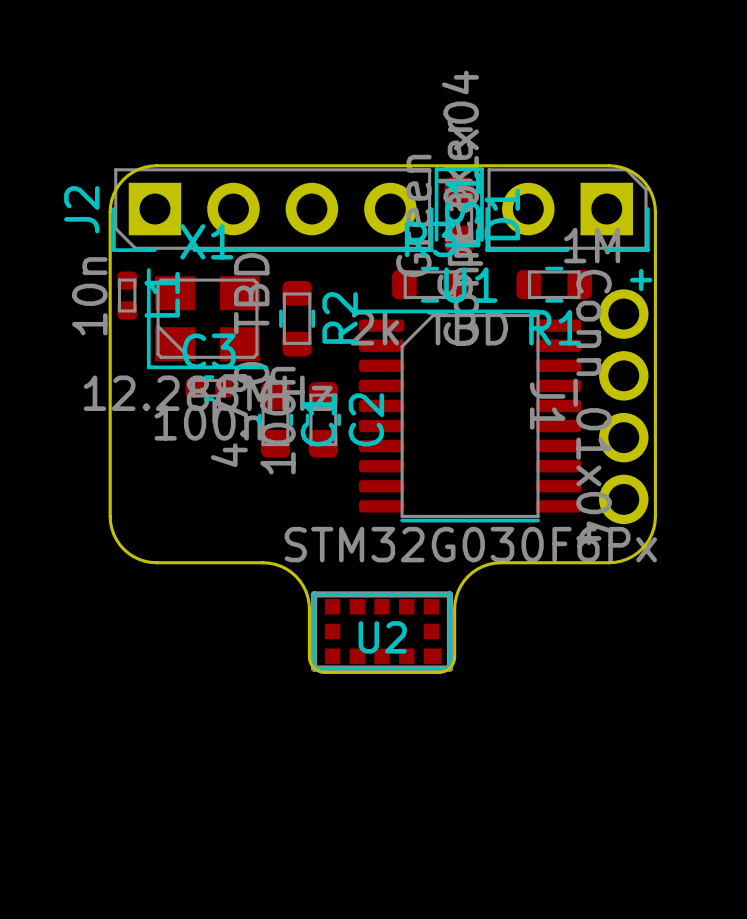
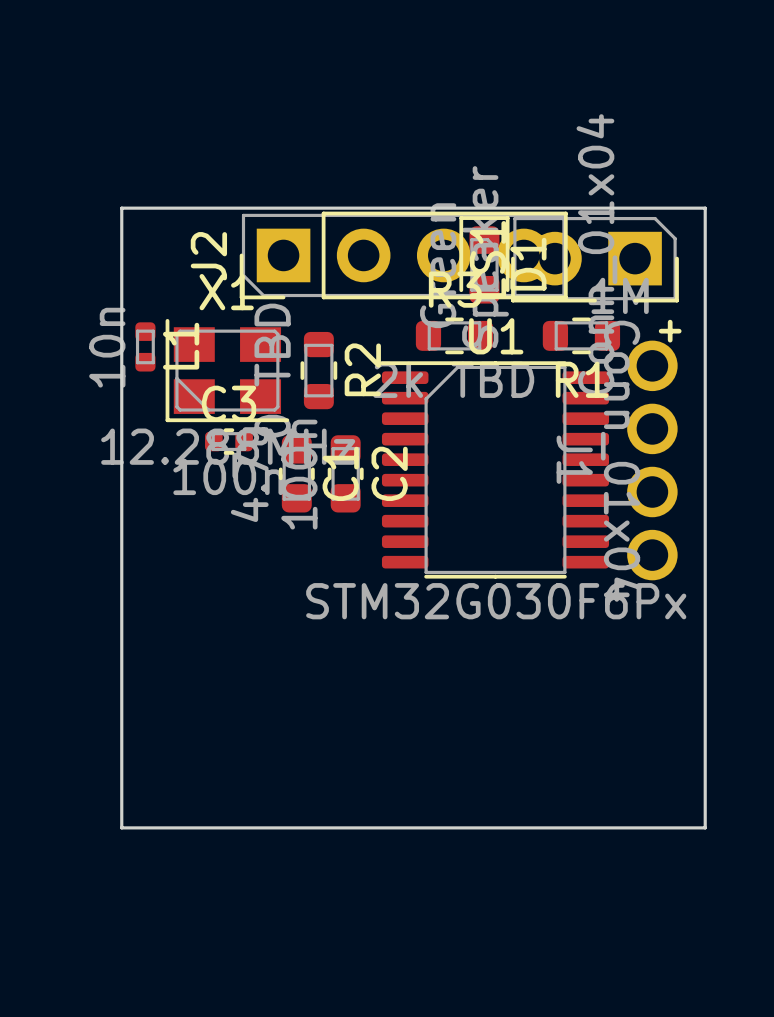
board edge: (156, 165) (609, 165) (626, 169) (637, 175) (649, 188) (653, 200) (655, 212) (655, 516) (651, 534) (645, 544) (632, 556) (615, 562) (500, 562) (488, 564) (477, 568) (464, 580) (458, 591) (454, 609) (454, 660) (448, 669) (439, 672) (324, 672) (315, 669) (309, 658) (307, 597) (303, 585) (295, 576) (280, 566) (263, 562) (150, 562) (138, 559) (128, 553) (119, 544) (113, 534) (110, 516) (110, 206) (116, 188) (128, 175) (138, 169) (156, 165) -> (121, 208) (121, 827) (705, 827) (705, 208) (121, 208)
J2 footprint: [112, 168, 434, 252] -> [239, 211, 568, 300]
U2: (382, 631) -> none

